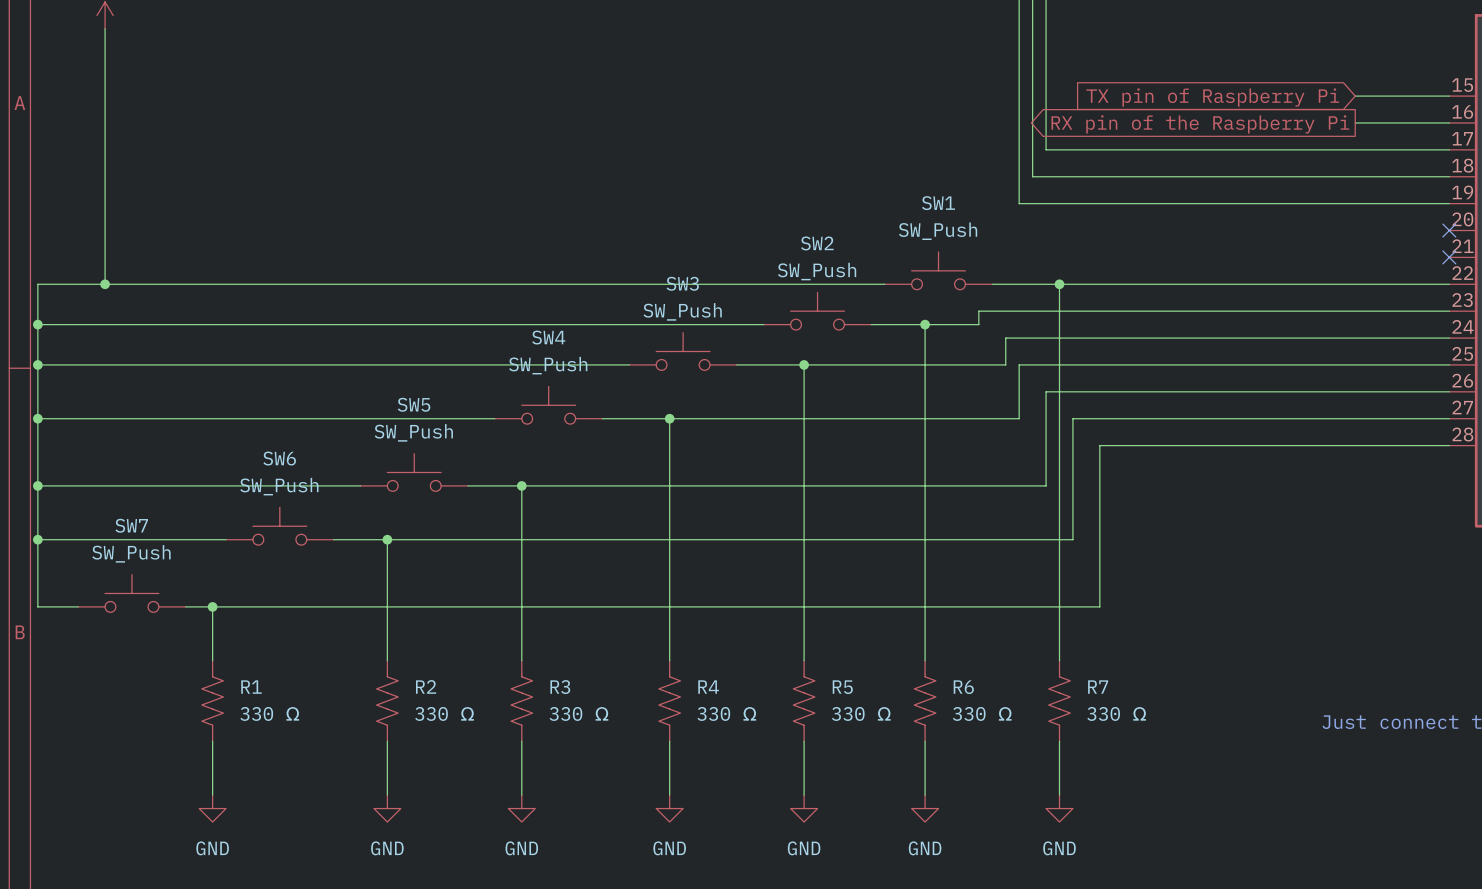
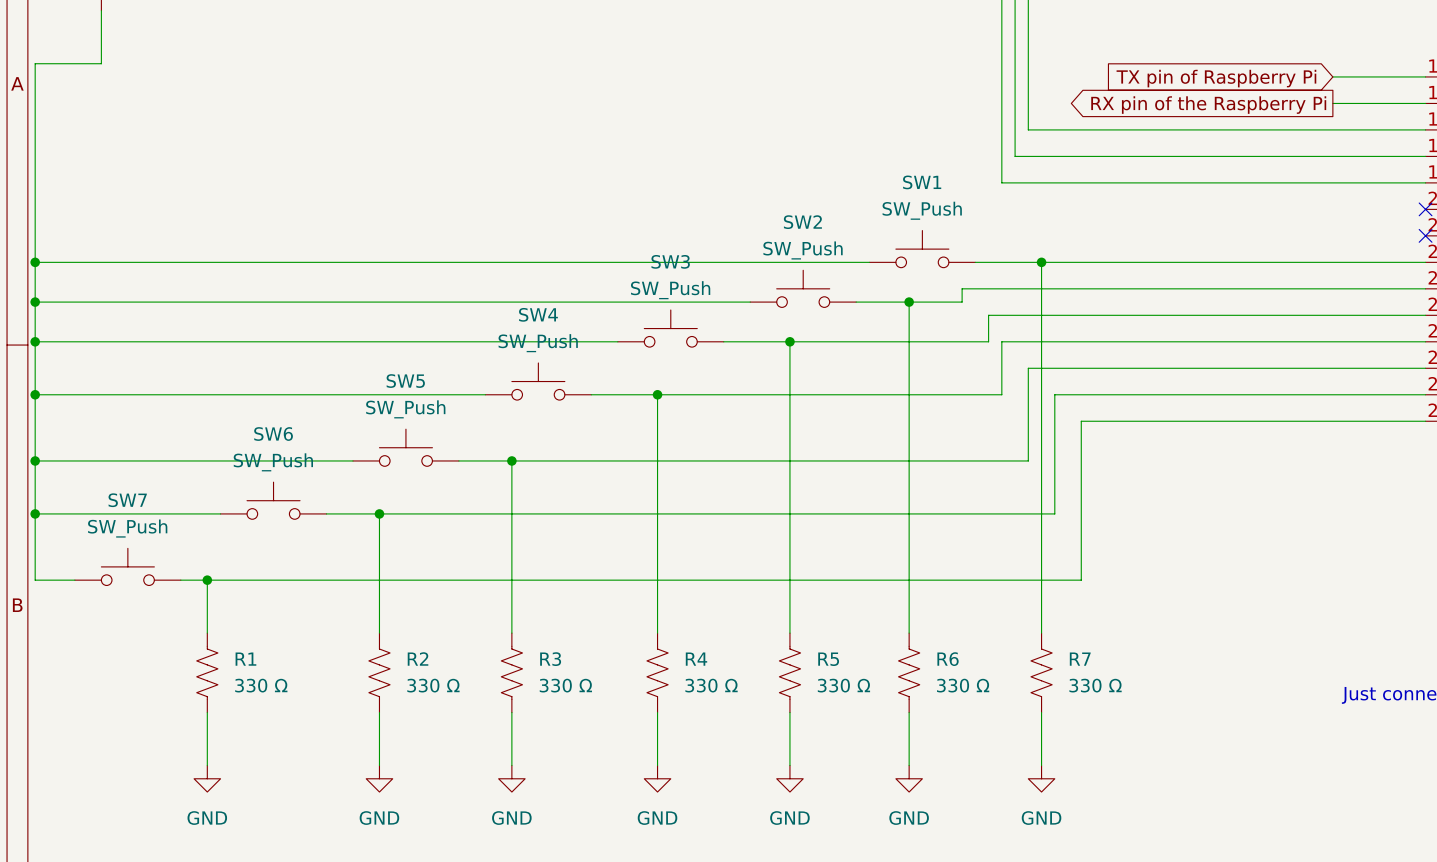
wire: (105, 82) (105, 284) -> (101, 63) (35, 63) (35, 262)
junction: none -> (35, 262)
junction: (105, 284) -> none

